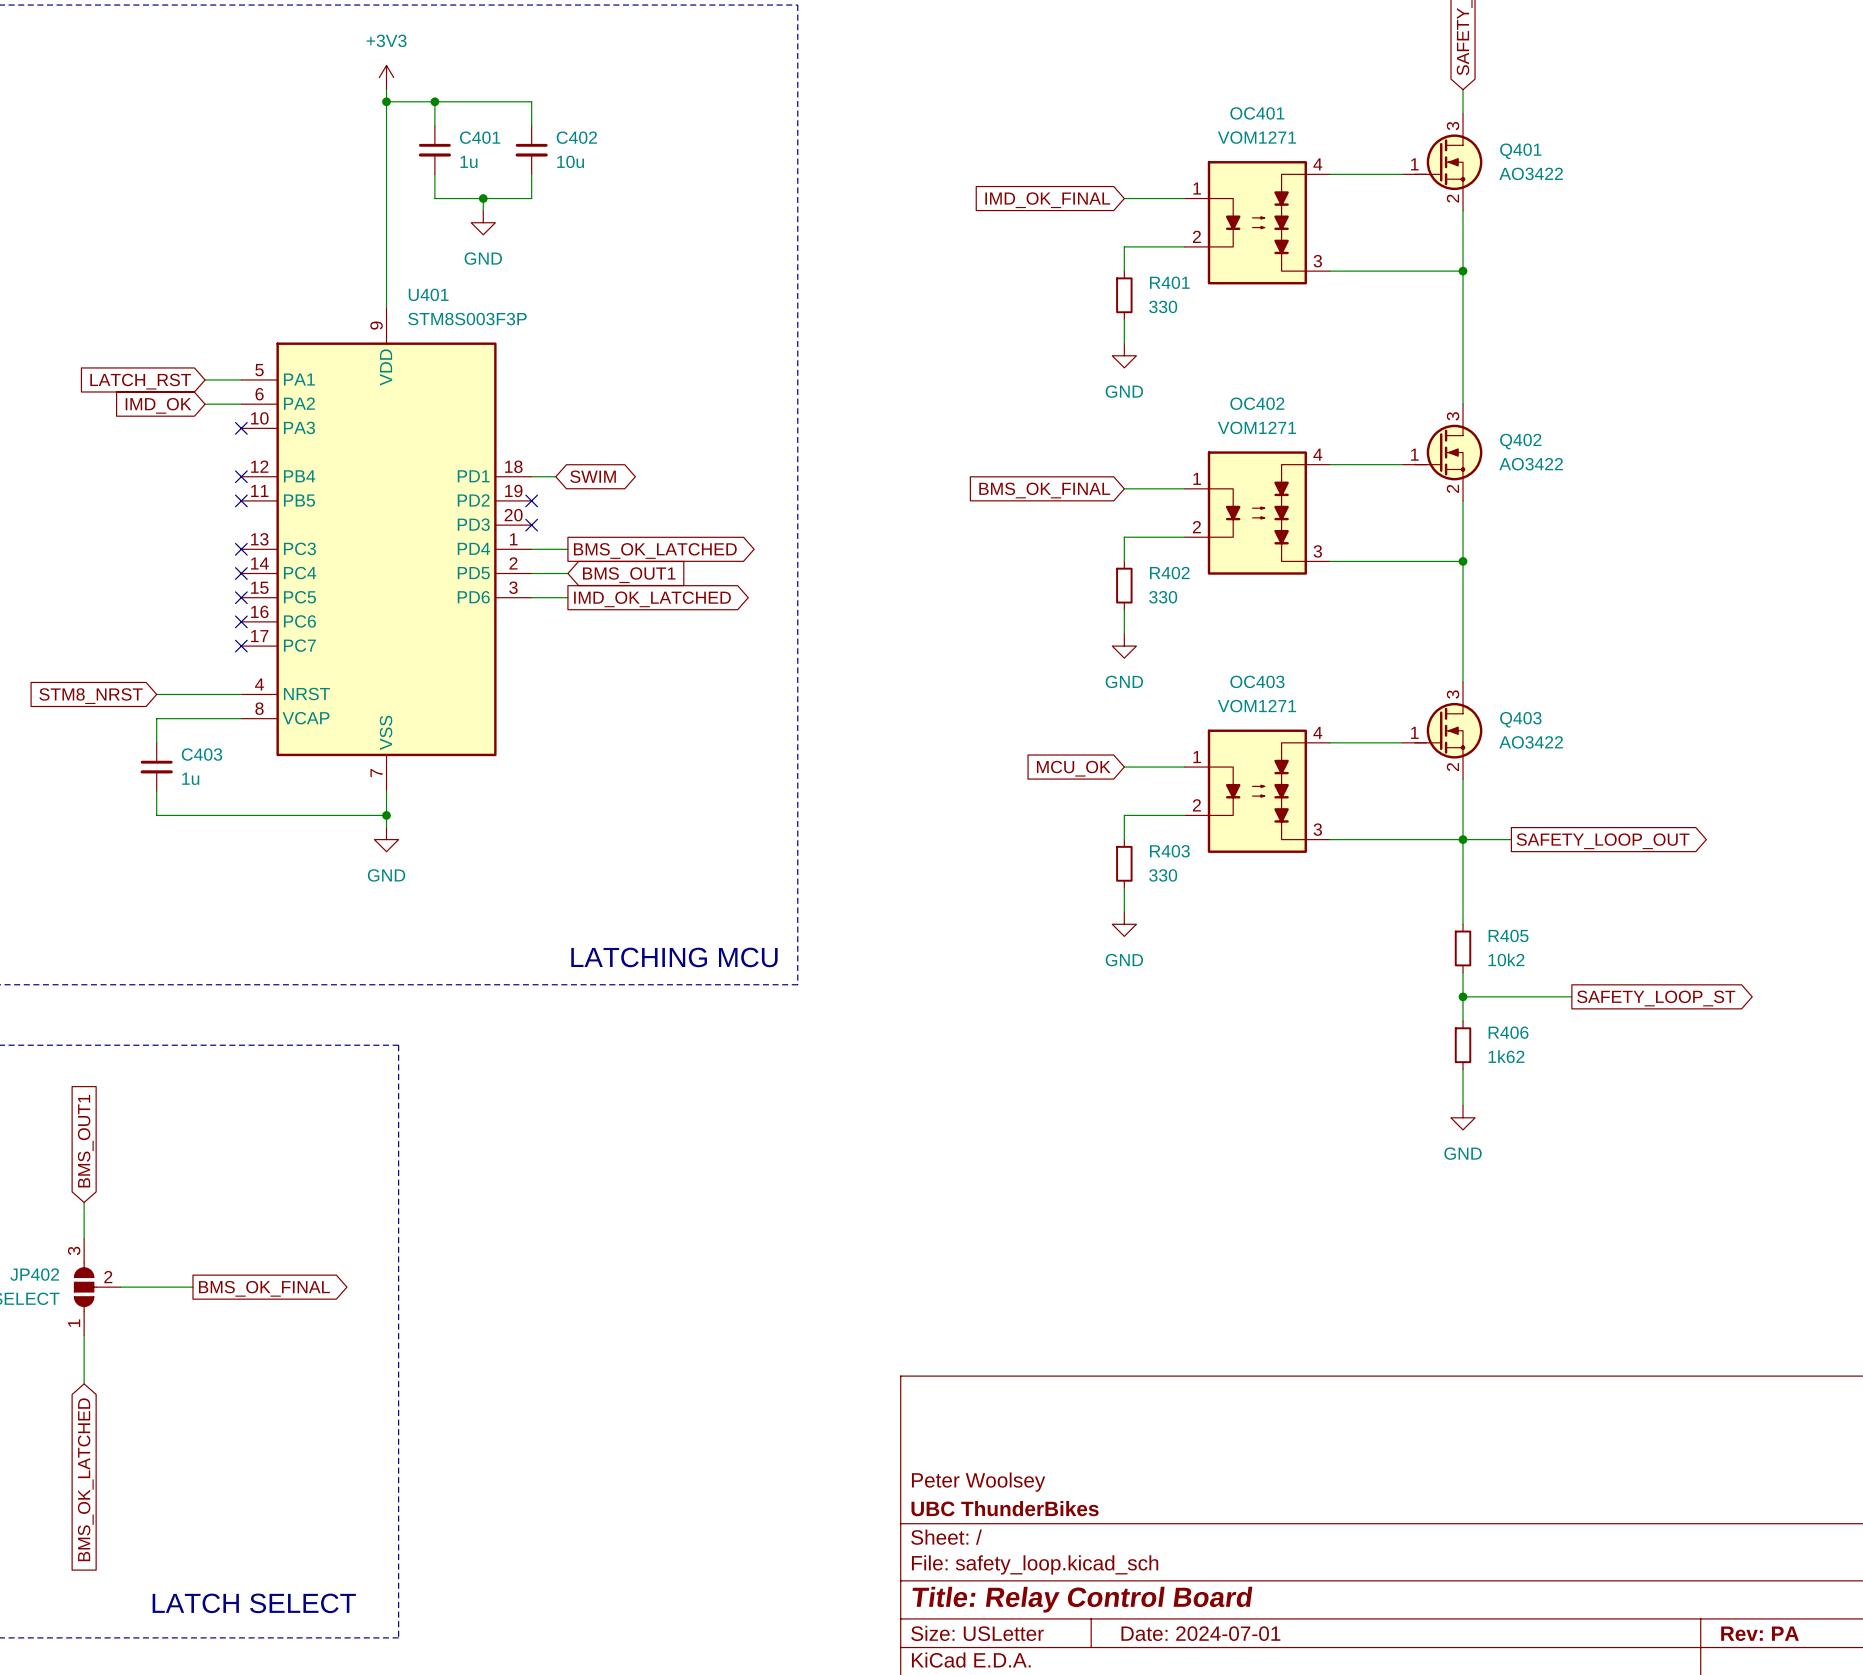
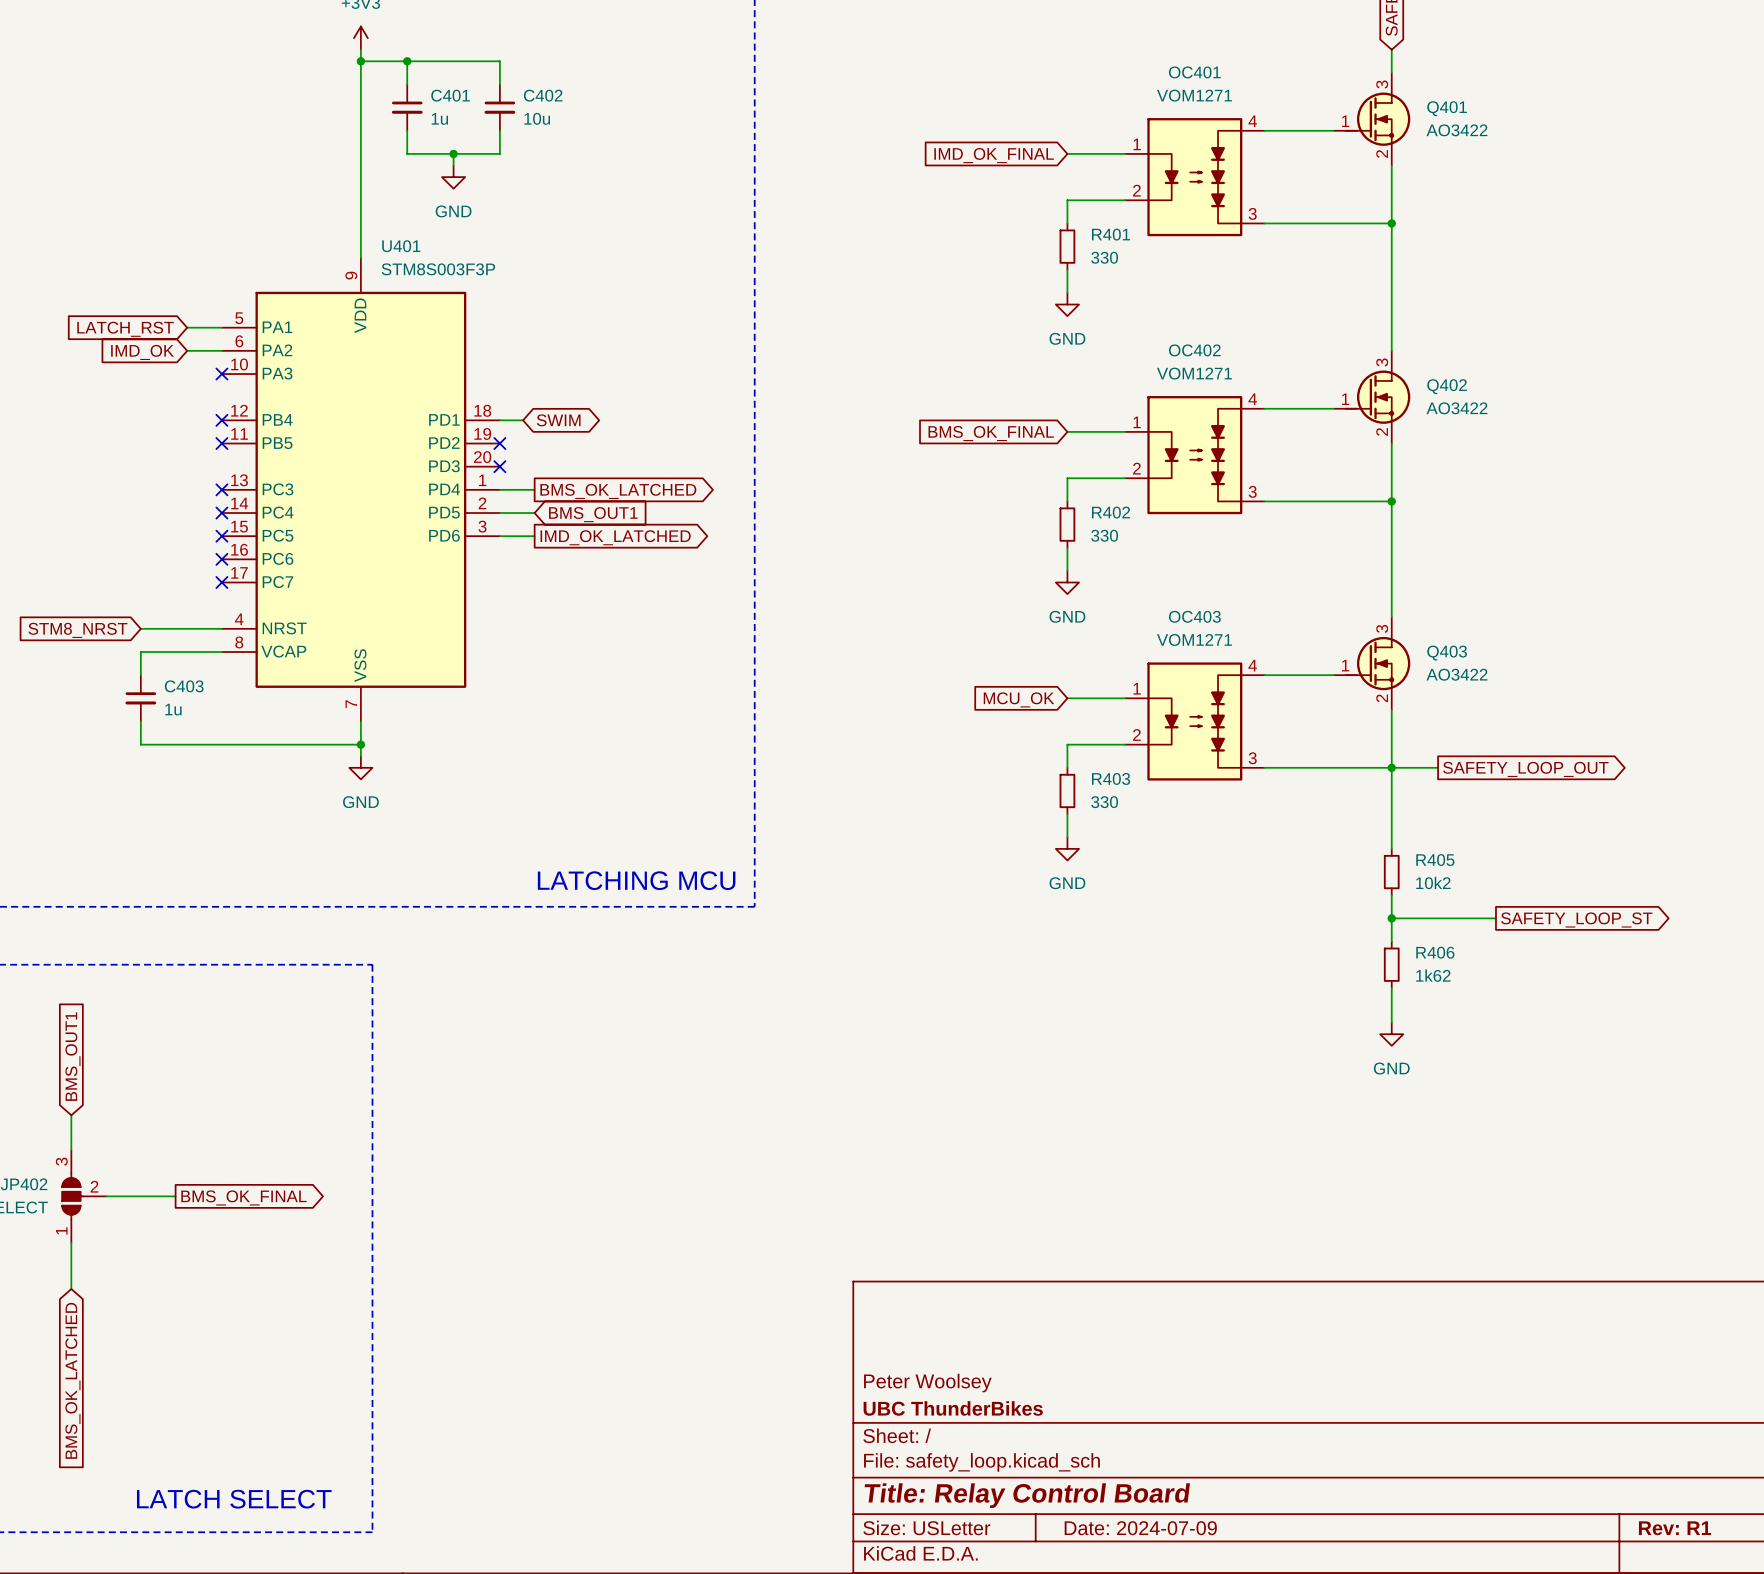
title block: Date: 2024-07-01 (1200, 1633) -> Date: 2024-07-09 (1140, 1528)
title block: Rev: PA (1760, 1633) -> Rev: R1 (1675, 1528)

